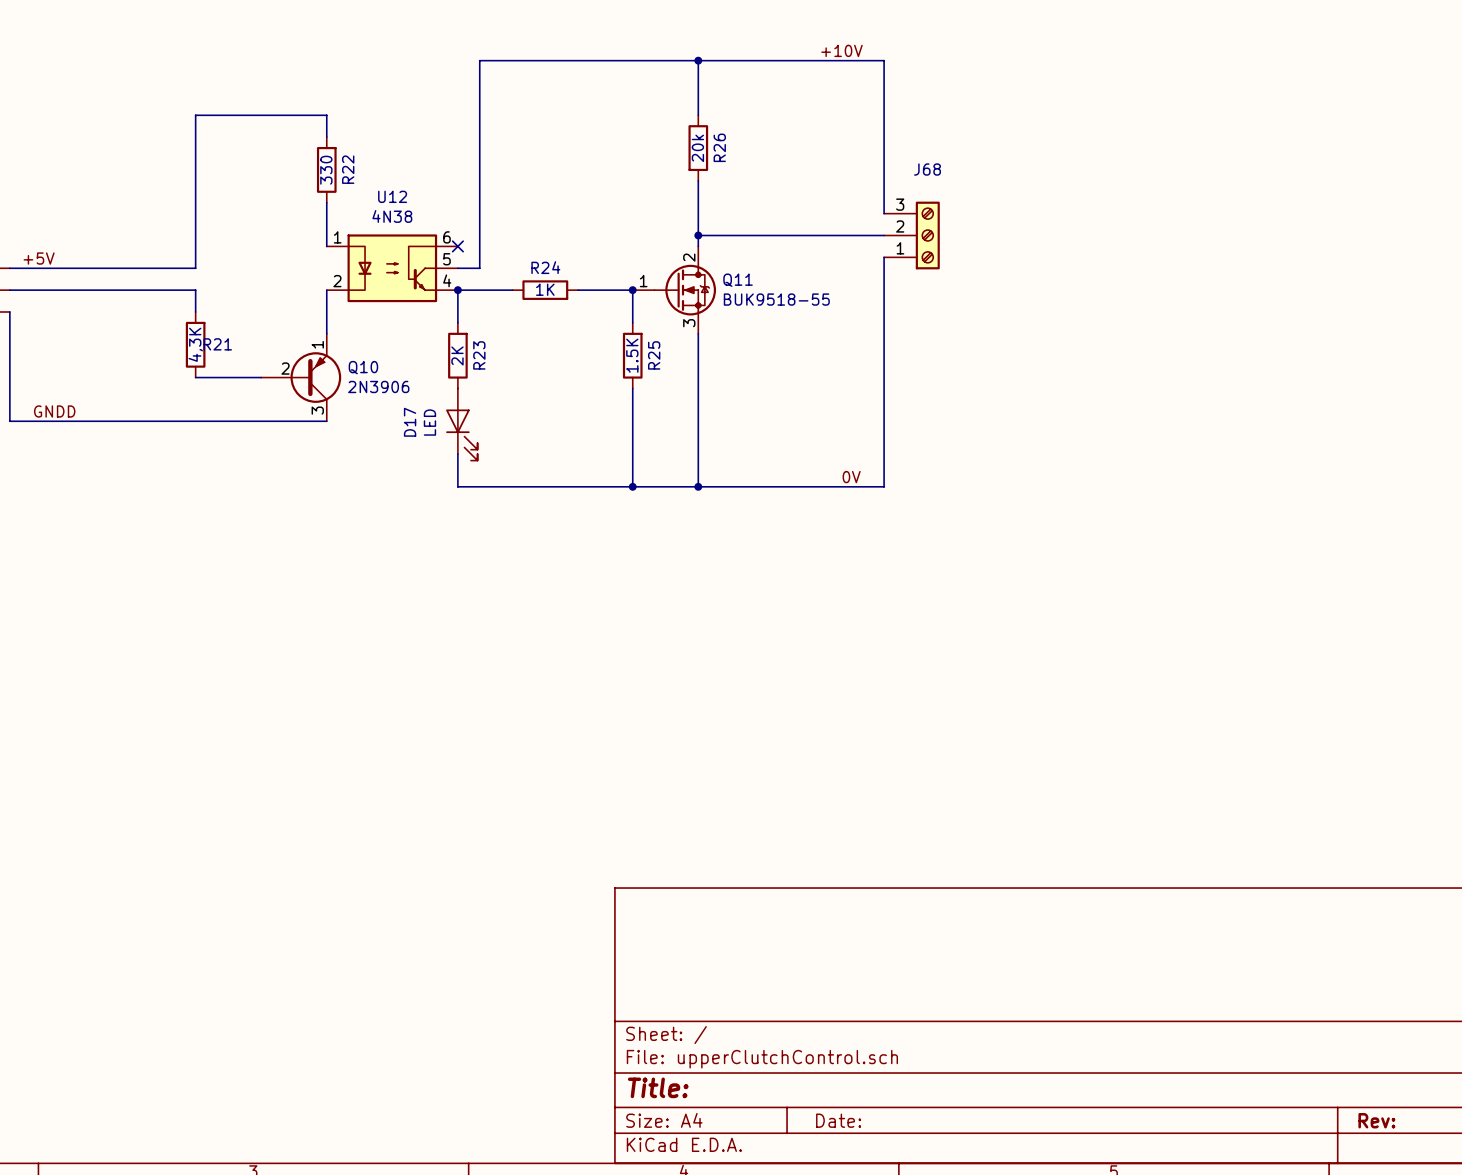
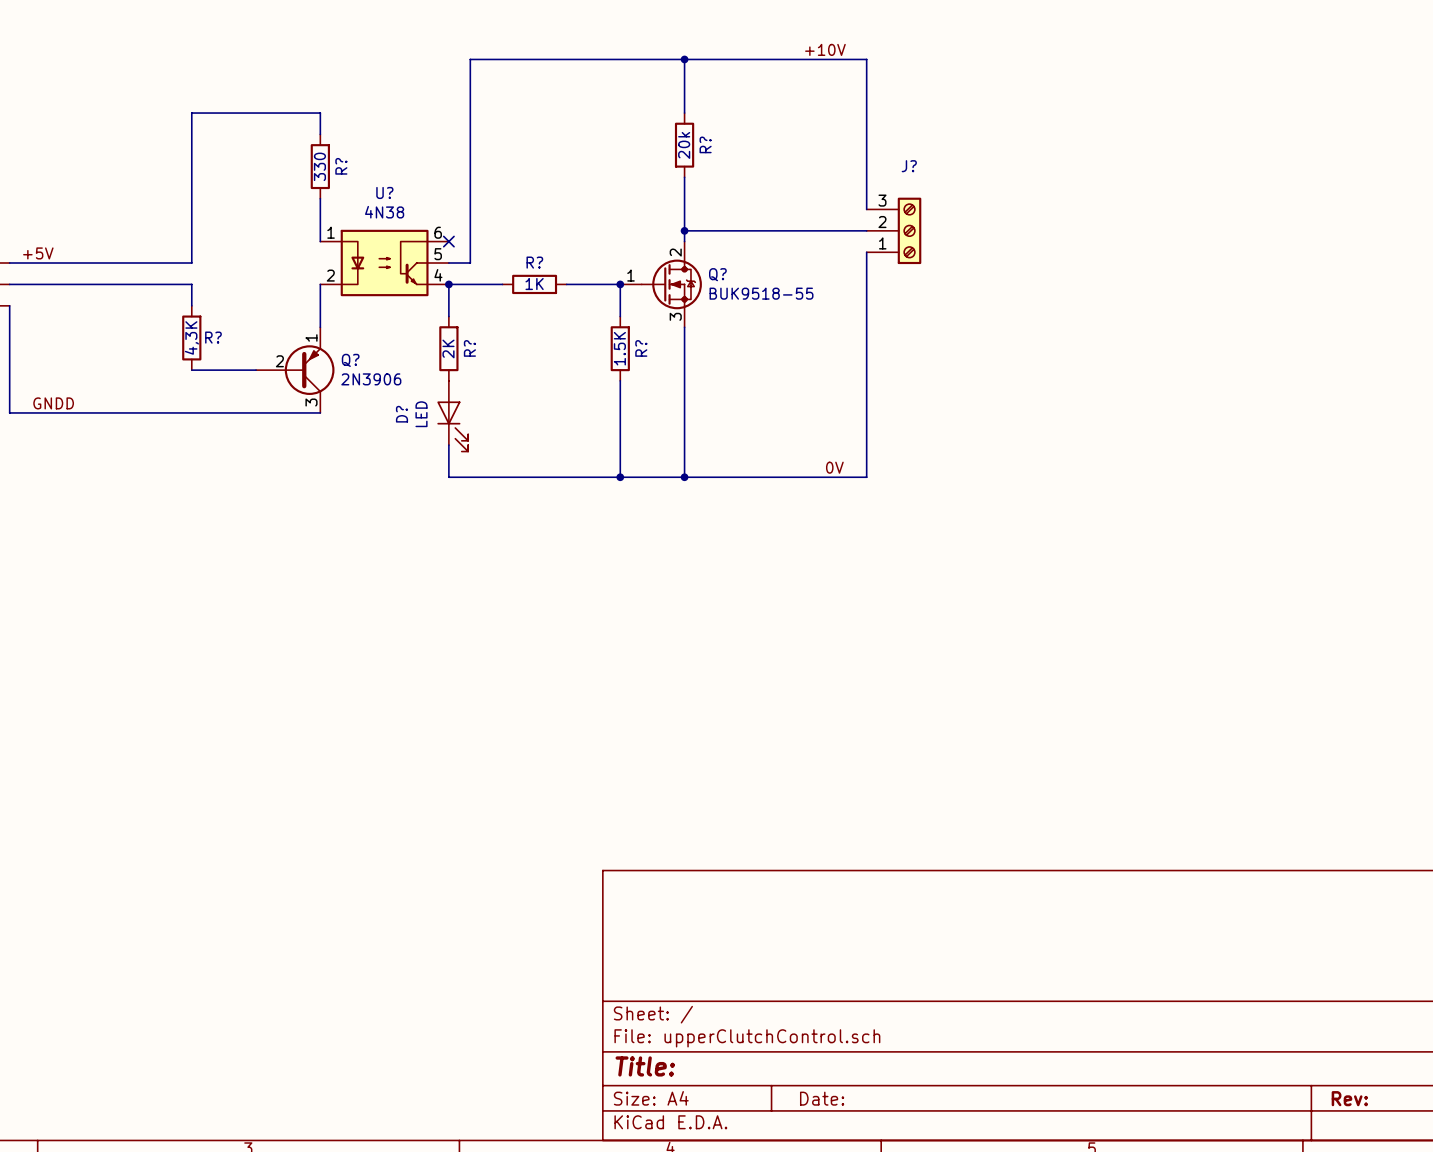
R26 name: R26 (719, 147) -> R? (705, 144)
R22 name: R22 (348, 169) -> R? (341, 166)
J68 name: J68 (927, 169) -> J? (909, 166)
U12 name: U12 (392, 196) -> U? (384, 192)
R24 name: R24 (545, 267) -> R? (534, 262)
Q11 name: Q11 (738, 280) -> Q? (717, 274)
R21 name: R21 (217, 344) -> R? (213, 337)
R23 name: R23 (479, 355) -> R? (469, 348)
R25 name: R25 (654, 355) -> R? (641, 348)
Q10 name: Q10 (363, 367) -> Q? (350, 360)
D17 name: D17 (410, 422) -> D? (402, 414)

